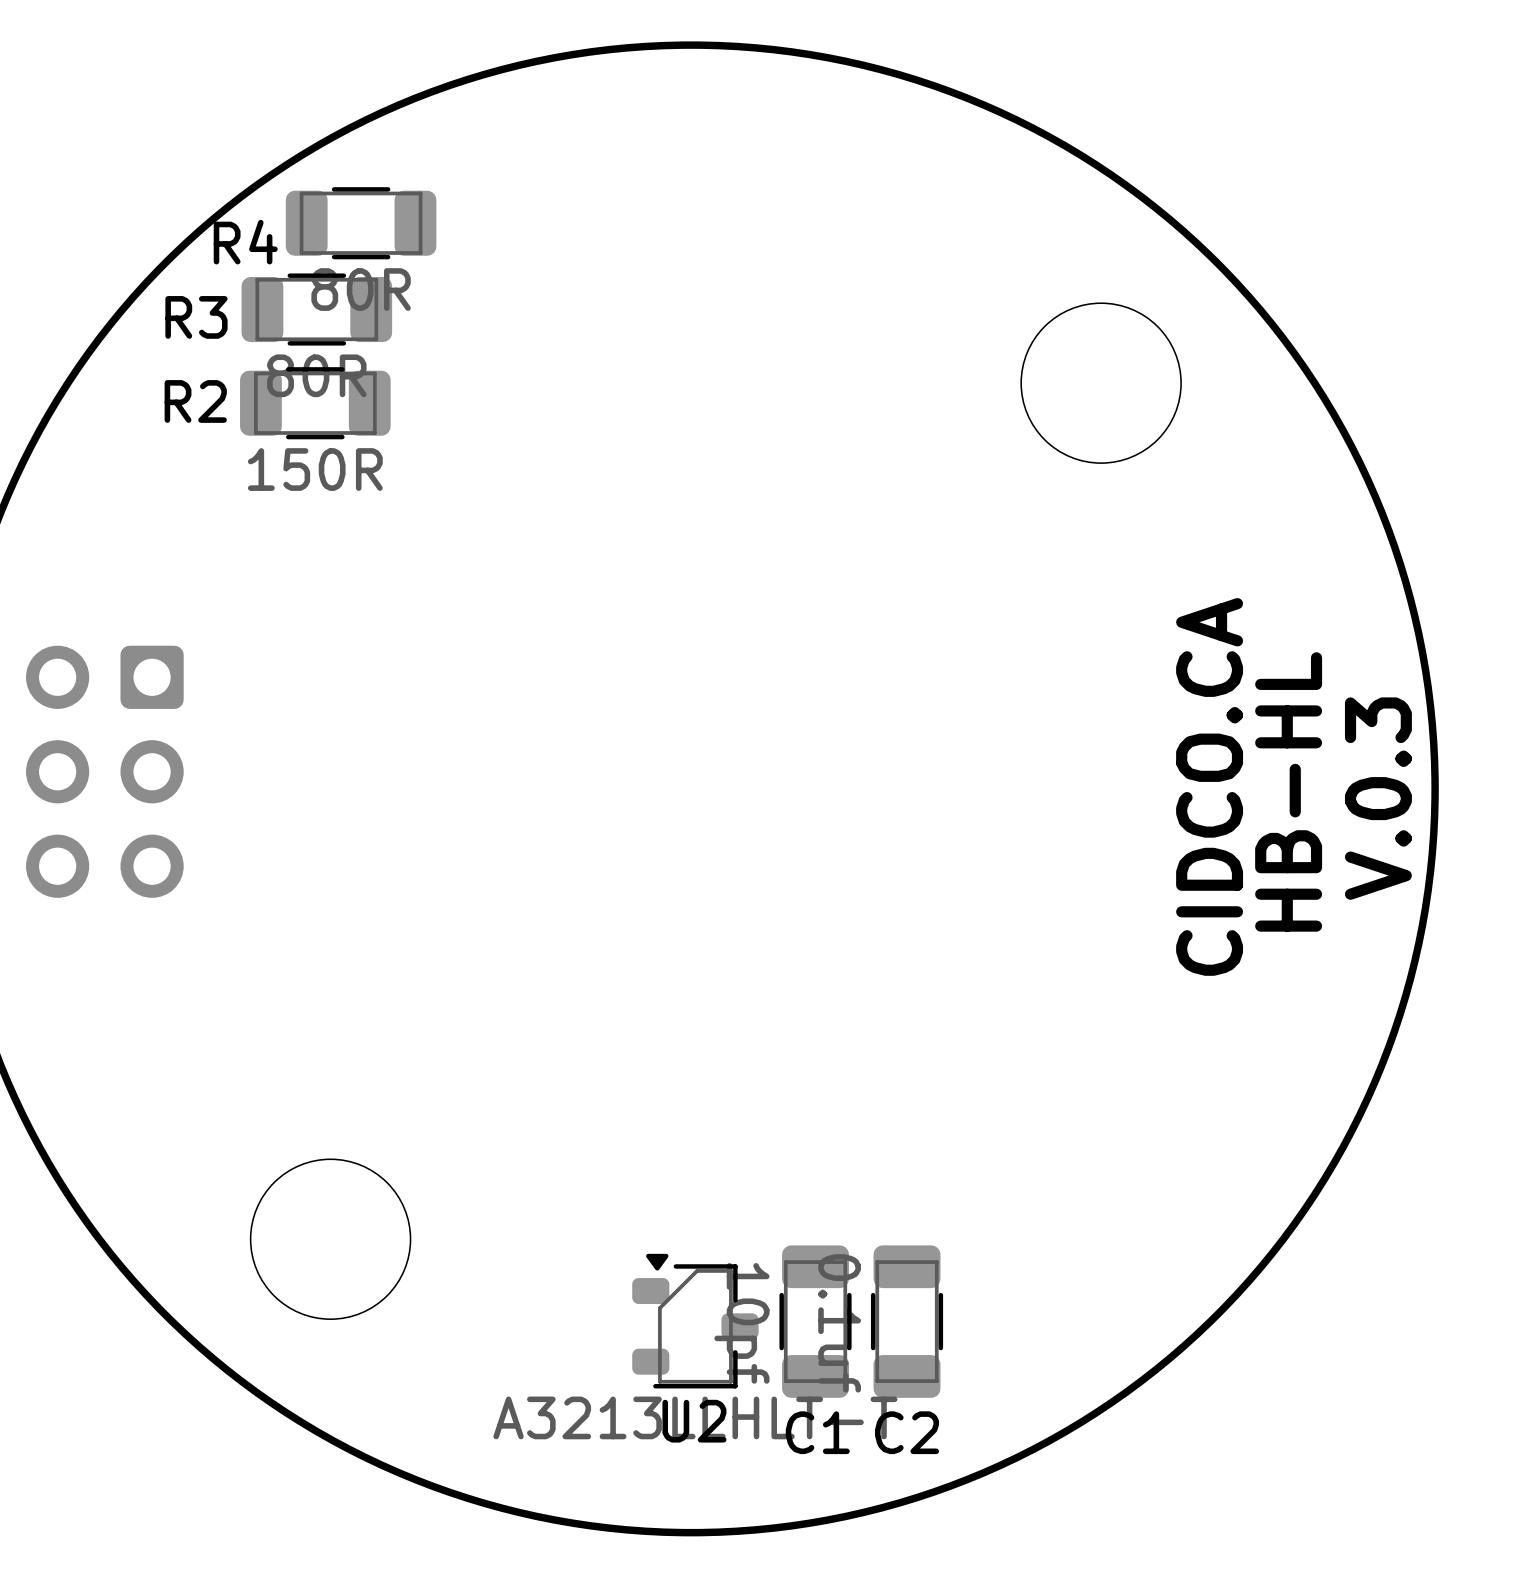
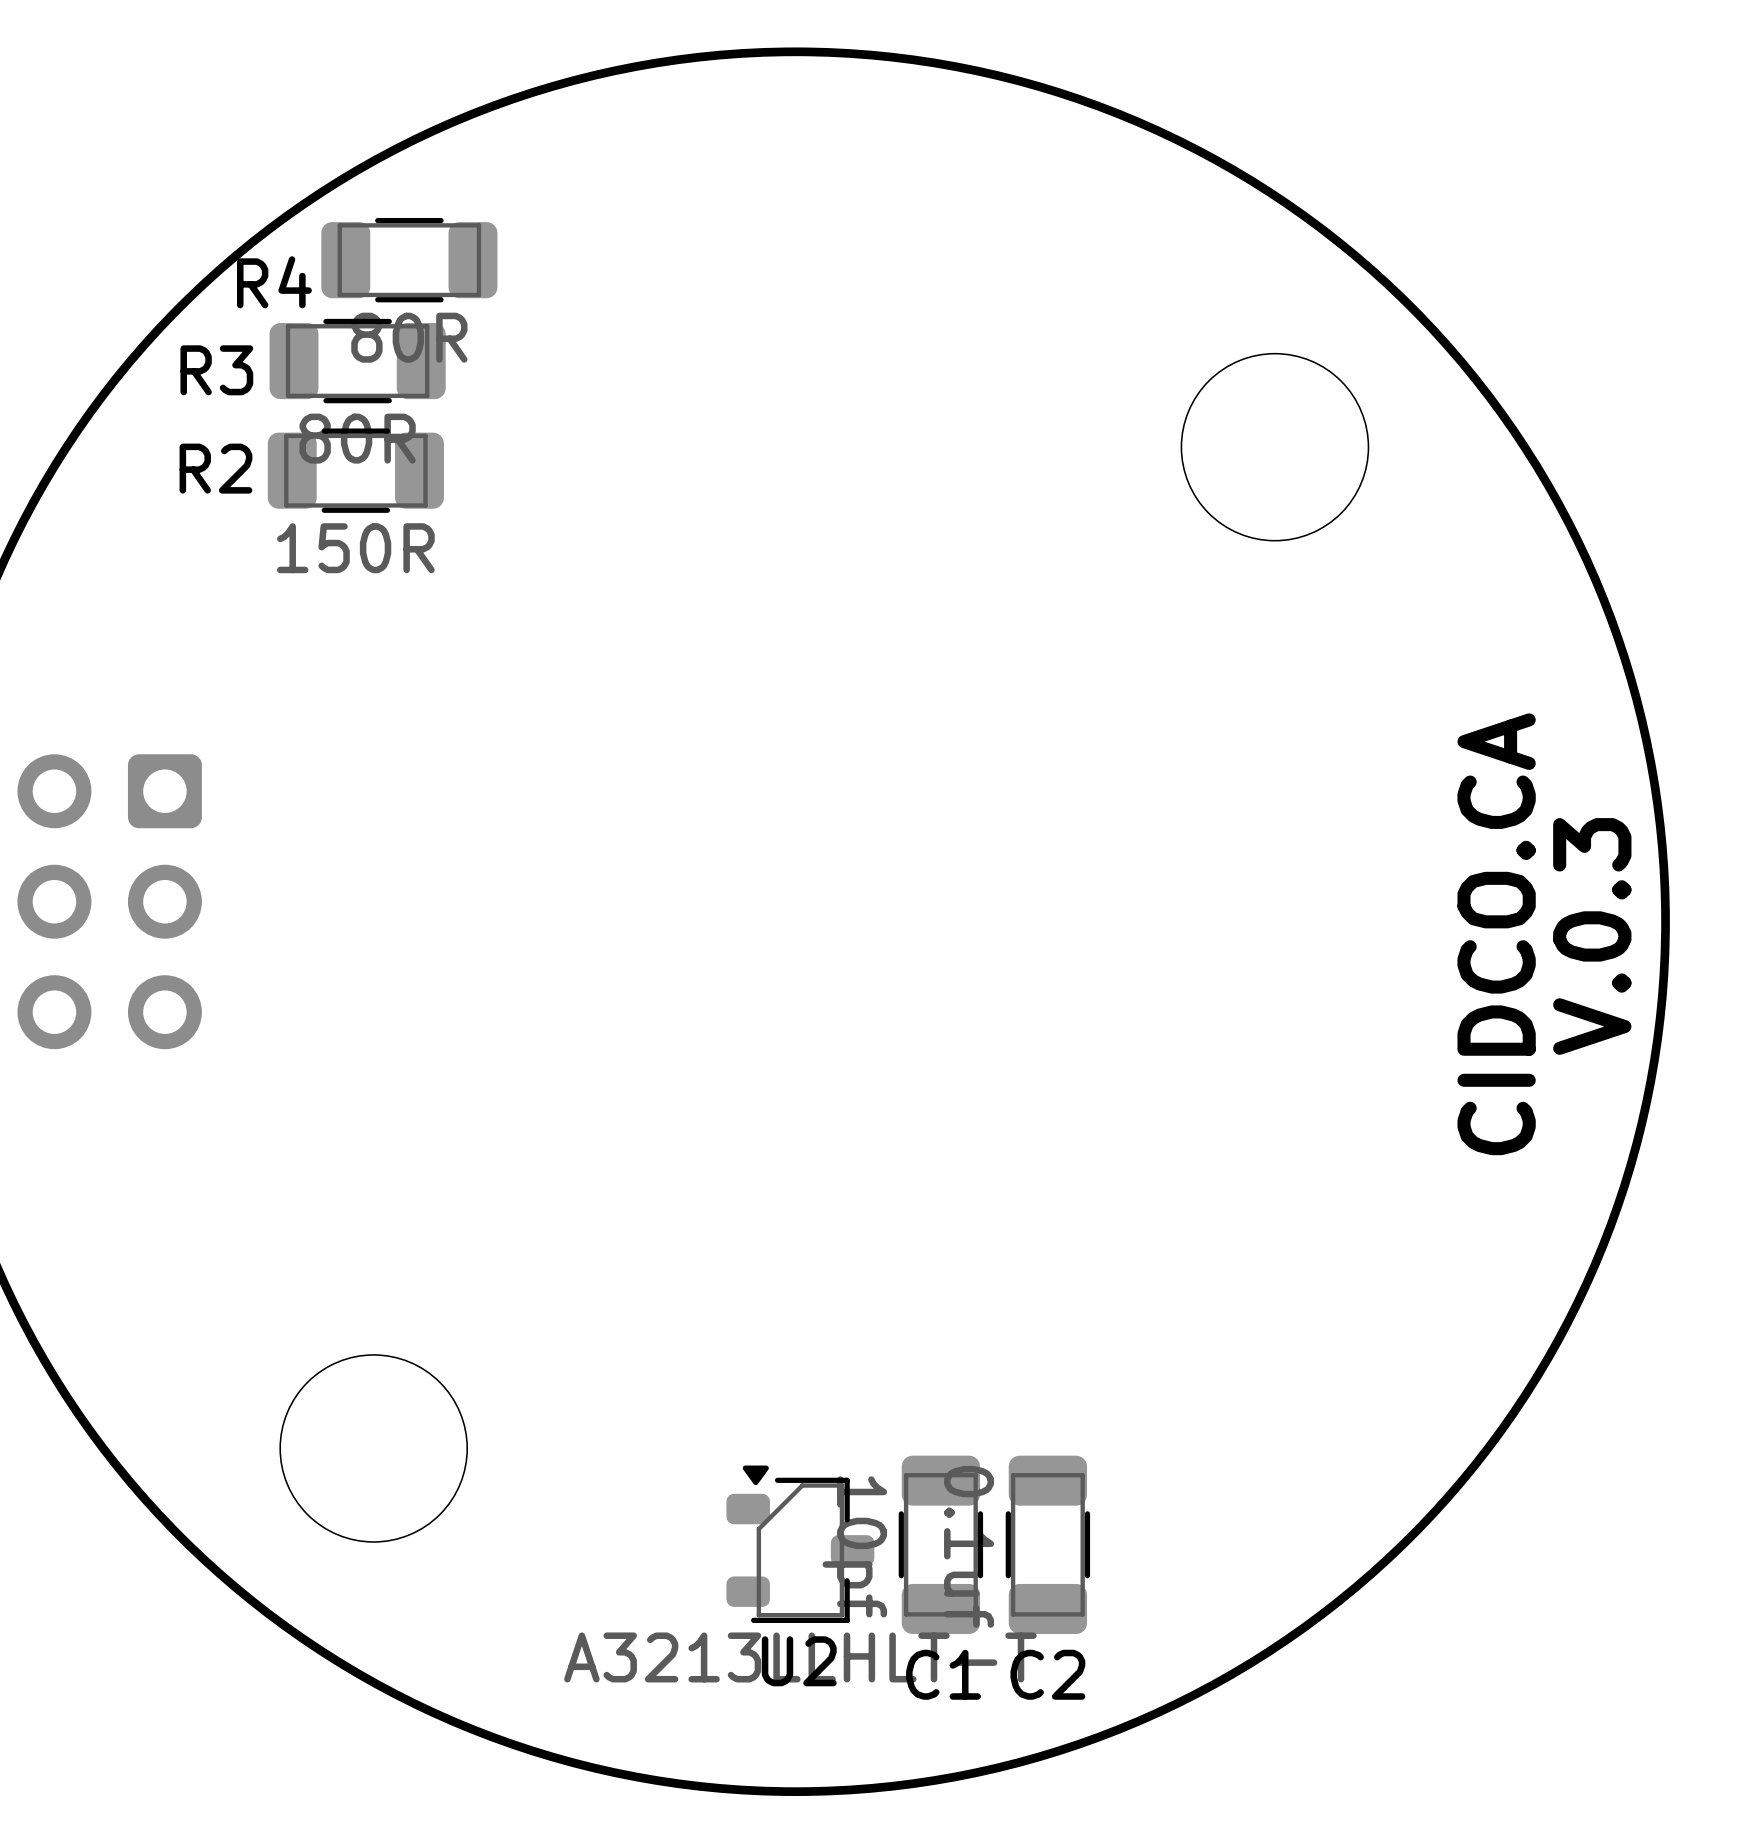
text position: CIDCO.CA (1209, 786) -> CIDCO.CA (1496, 934)
text: HB-HL (1288, 791) -> none
text position: V.0.3 (1378, 798) -> V.0.3 (1592, 936)

